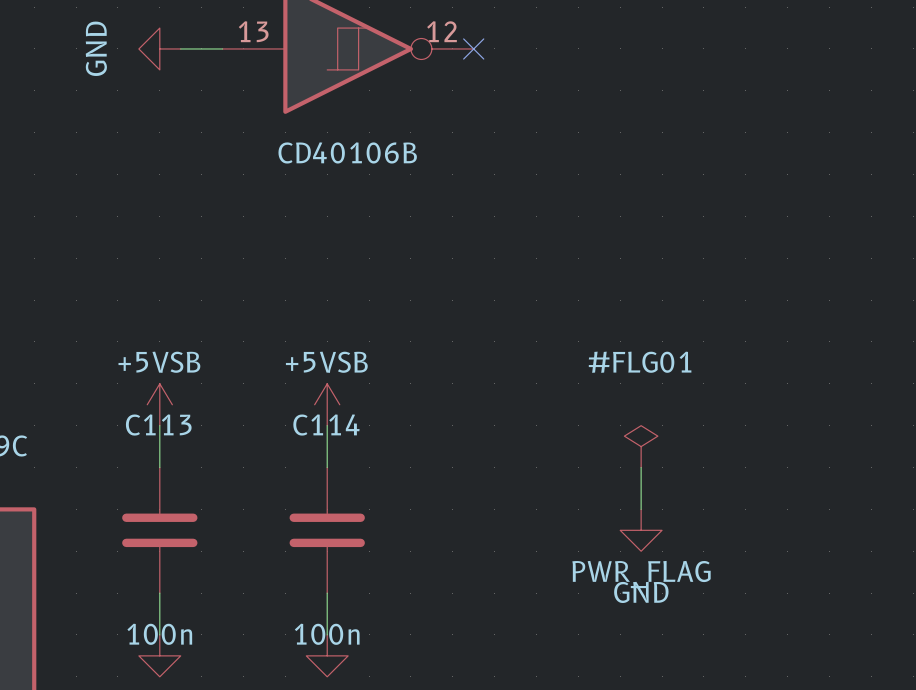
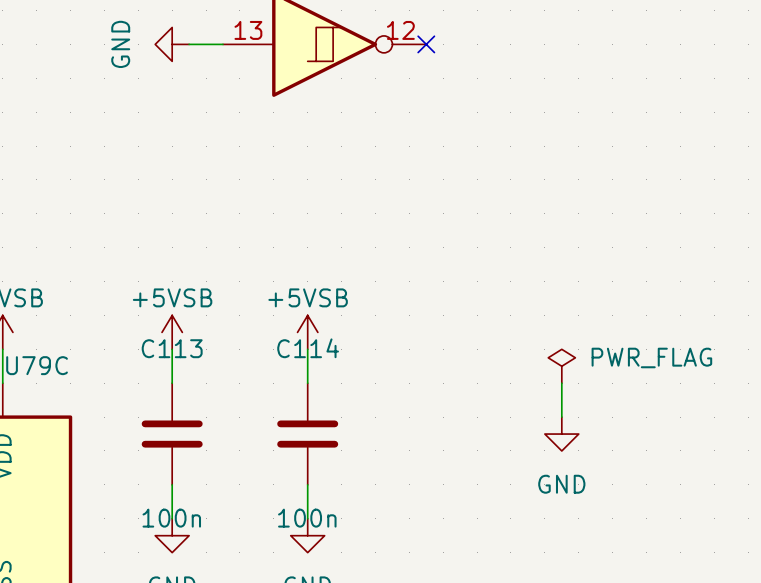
part value: CD40106B (347, 152) -> none
#FLG01 name: #FLG01 (640, 362) -> none
#FLG01 text position: PWR_FLAG (641, 574) -> PWR_FLAG (651, 357)

